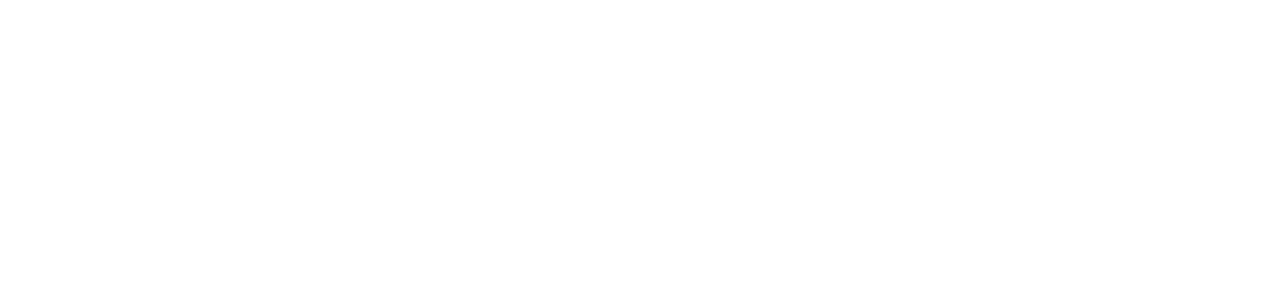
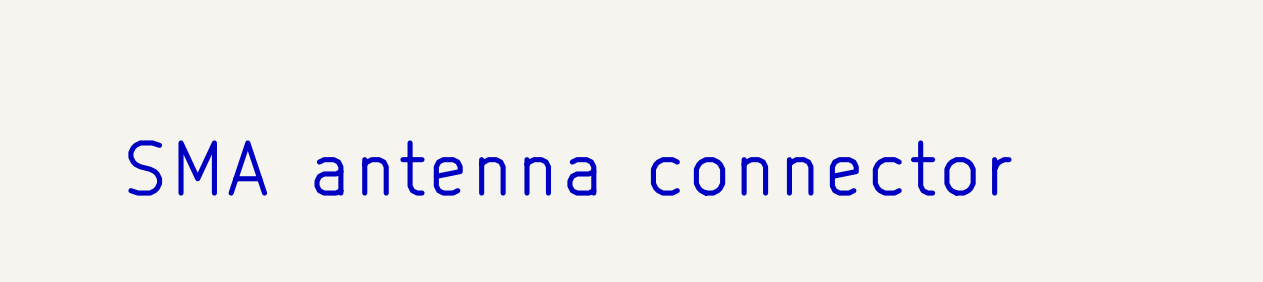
text: none -> SMA antenna connector (569, 168)

